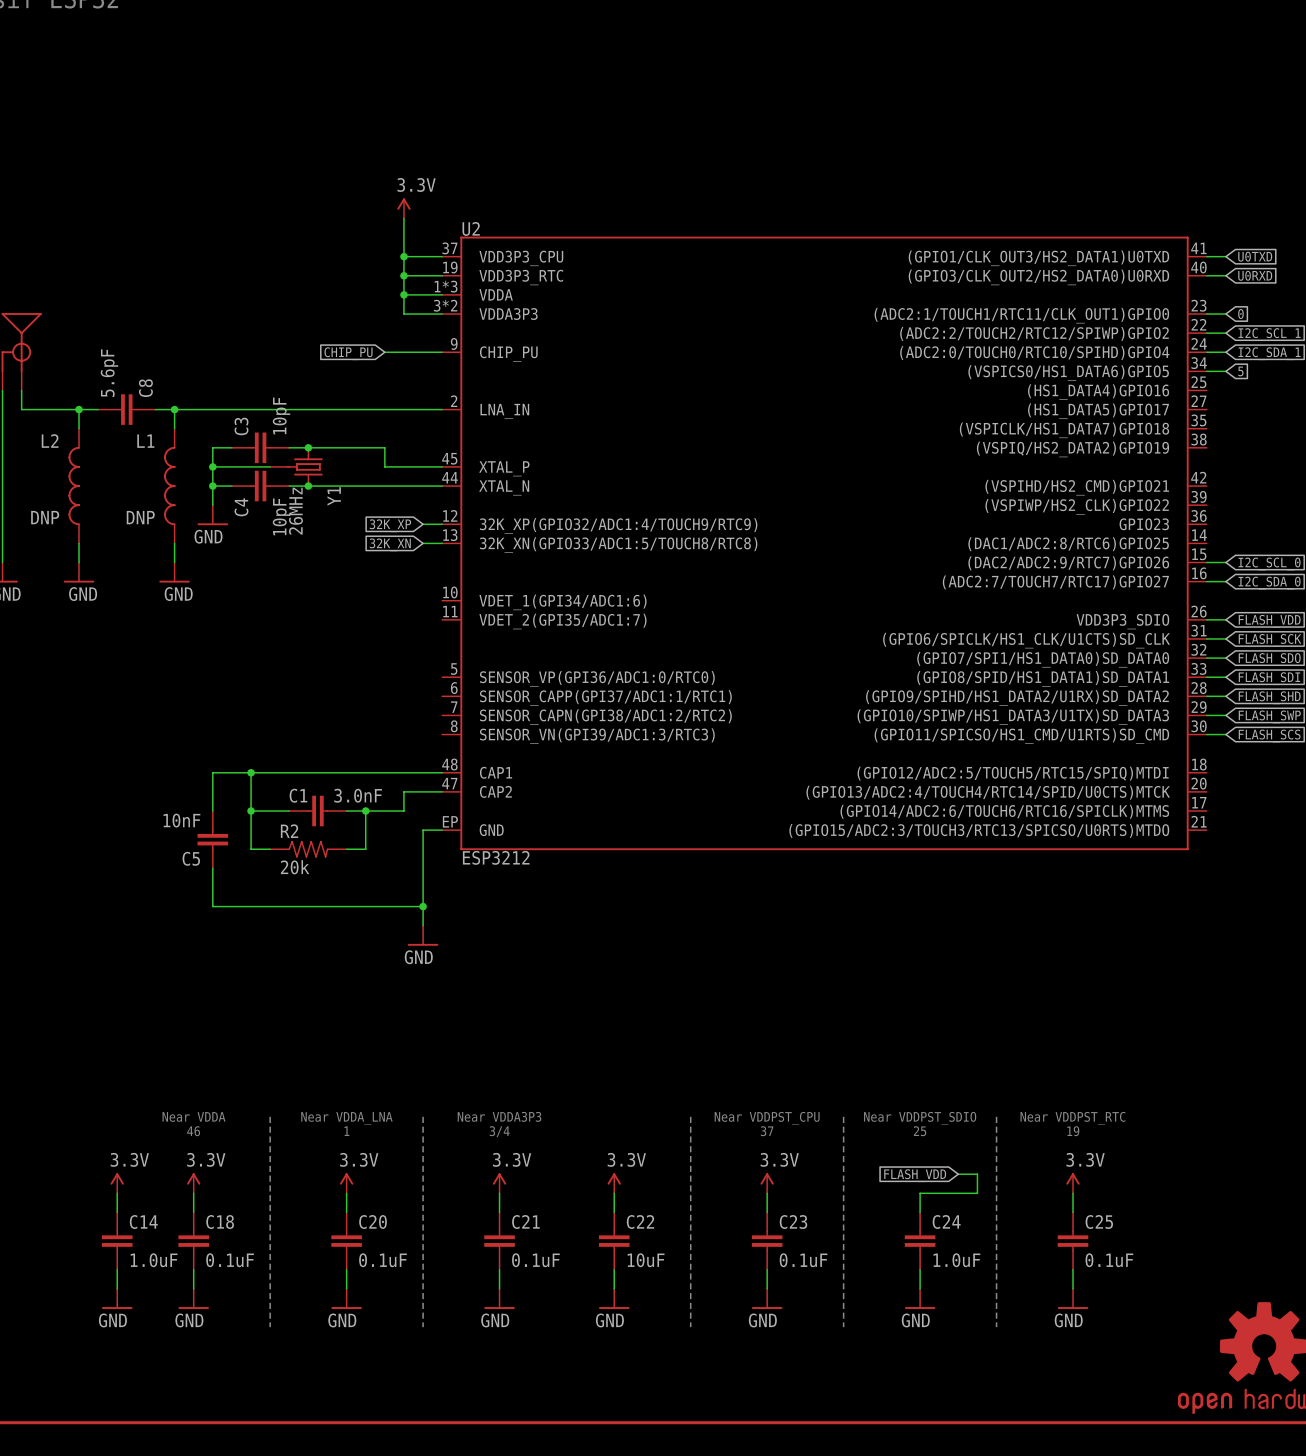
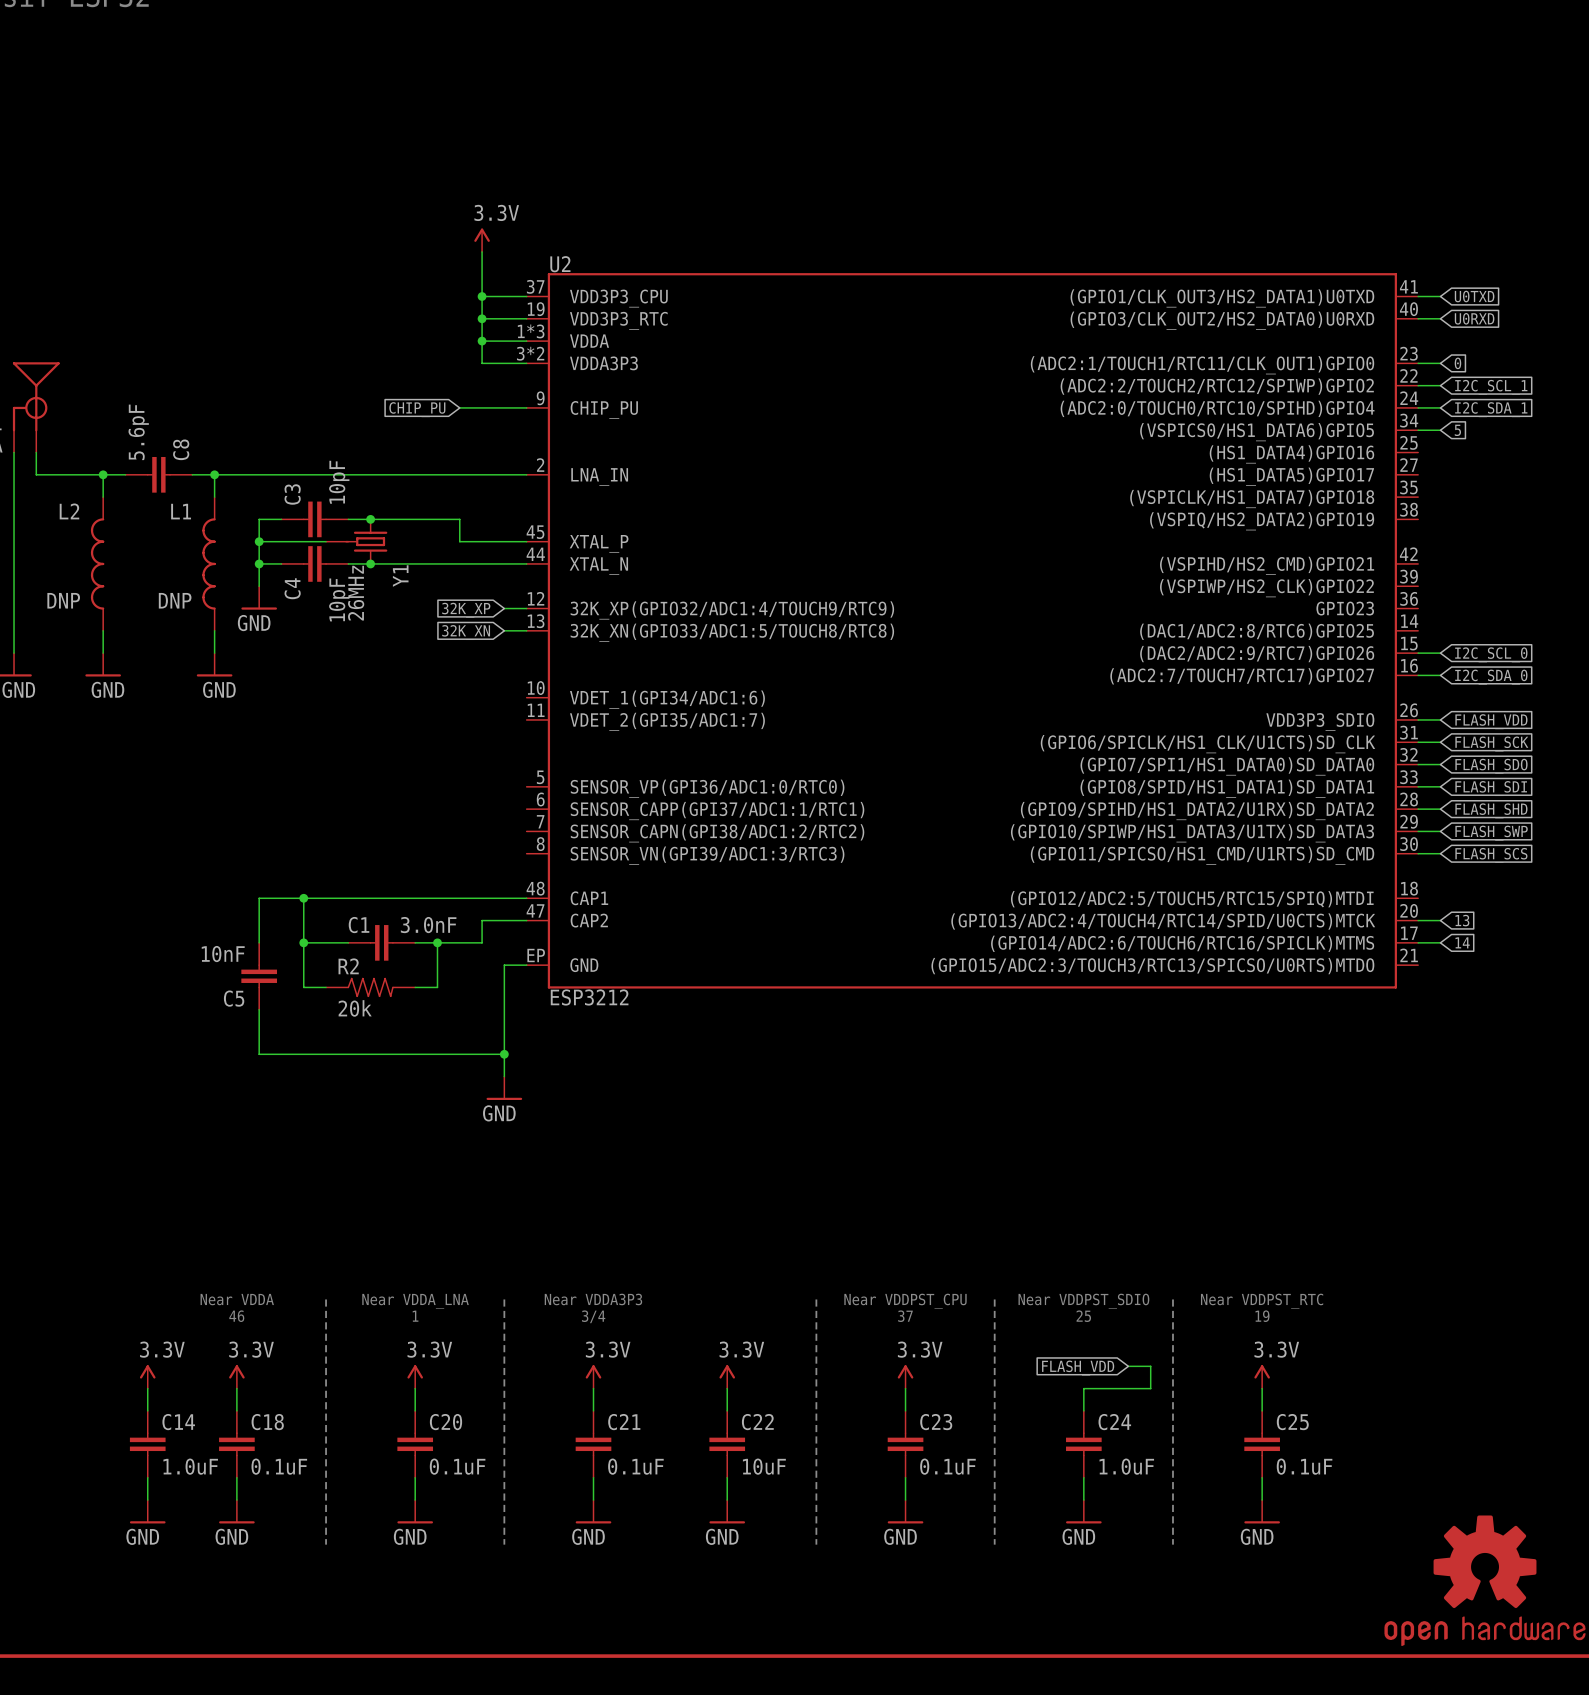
wire: none -> (1418, 920) (1440, 920)
global label: none -> 13 (1462, 920)
wire: none -> (1418, 942) (1440, 942)
global label: none -> 14 (1462, 942)

